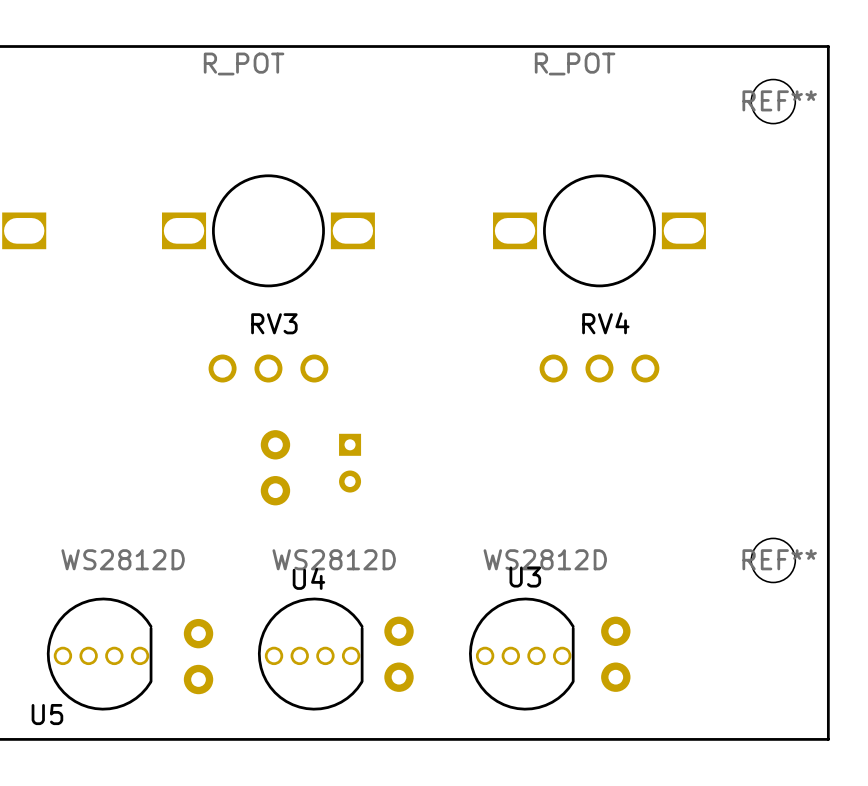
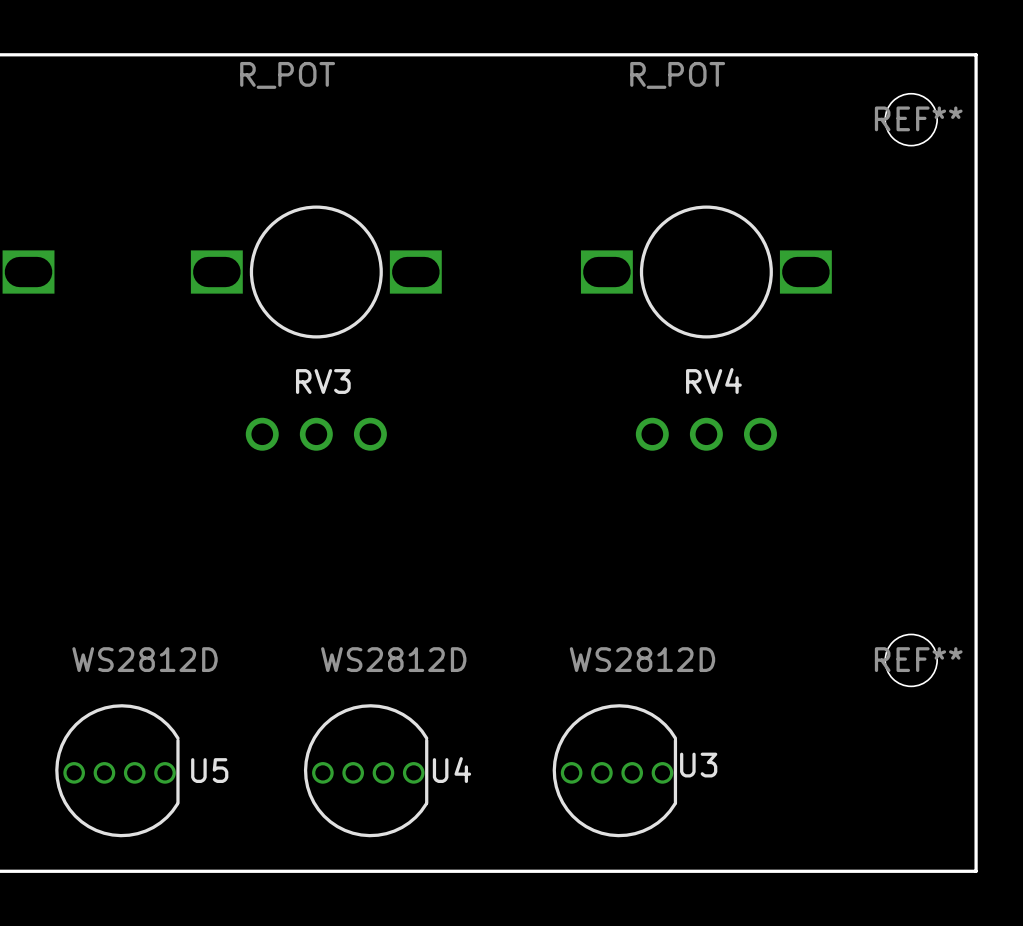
part: (350, 463) -> none
part: (275, 467) -> none
U3 name position: U3 (525, 577) -> U3 (698, 765)
U4 name position: U4 (308, 578) -> U4 (451, 770)
part: (399, 654) -> none
part: (615, 654) -> none
part: (198, 656) -> none
U5 name position: U5 (47, 714) -> U5 (209, 770)

